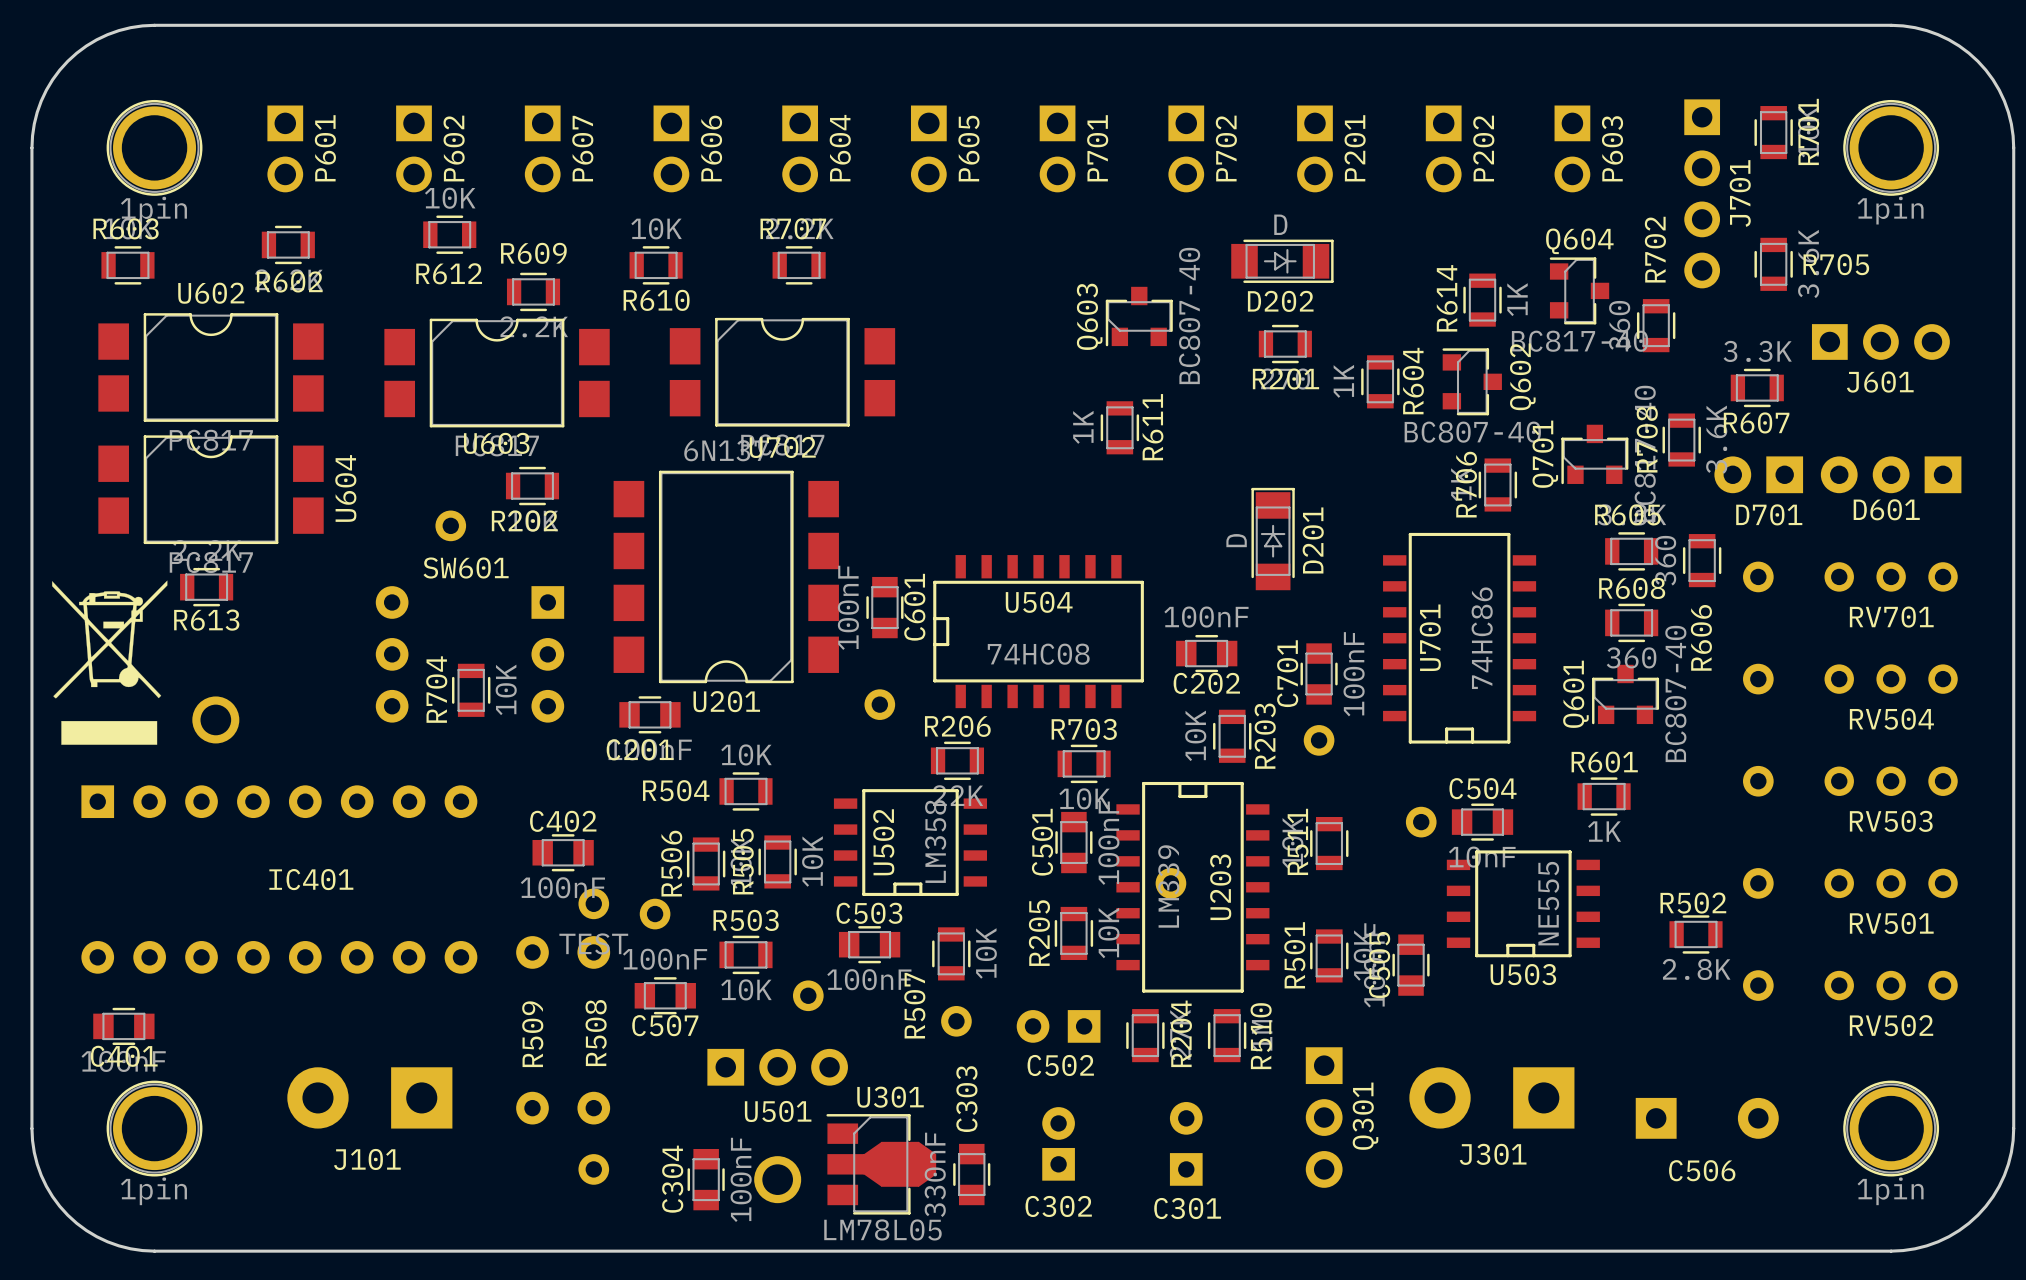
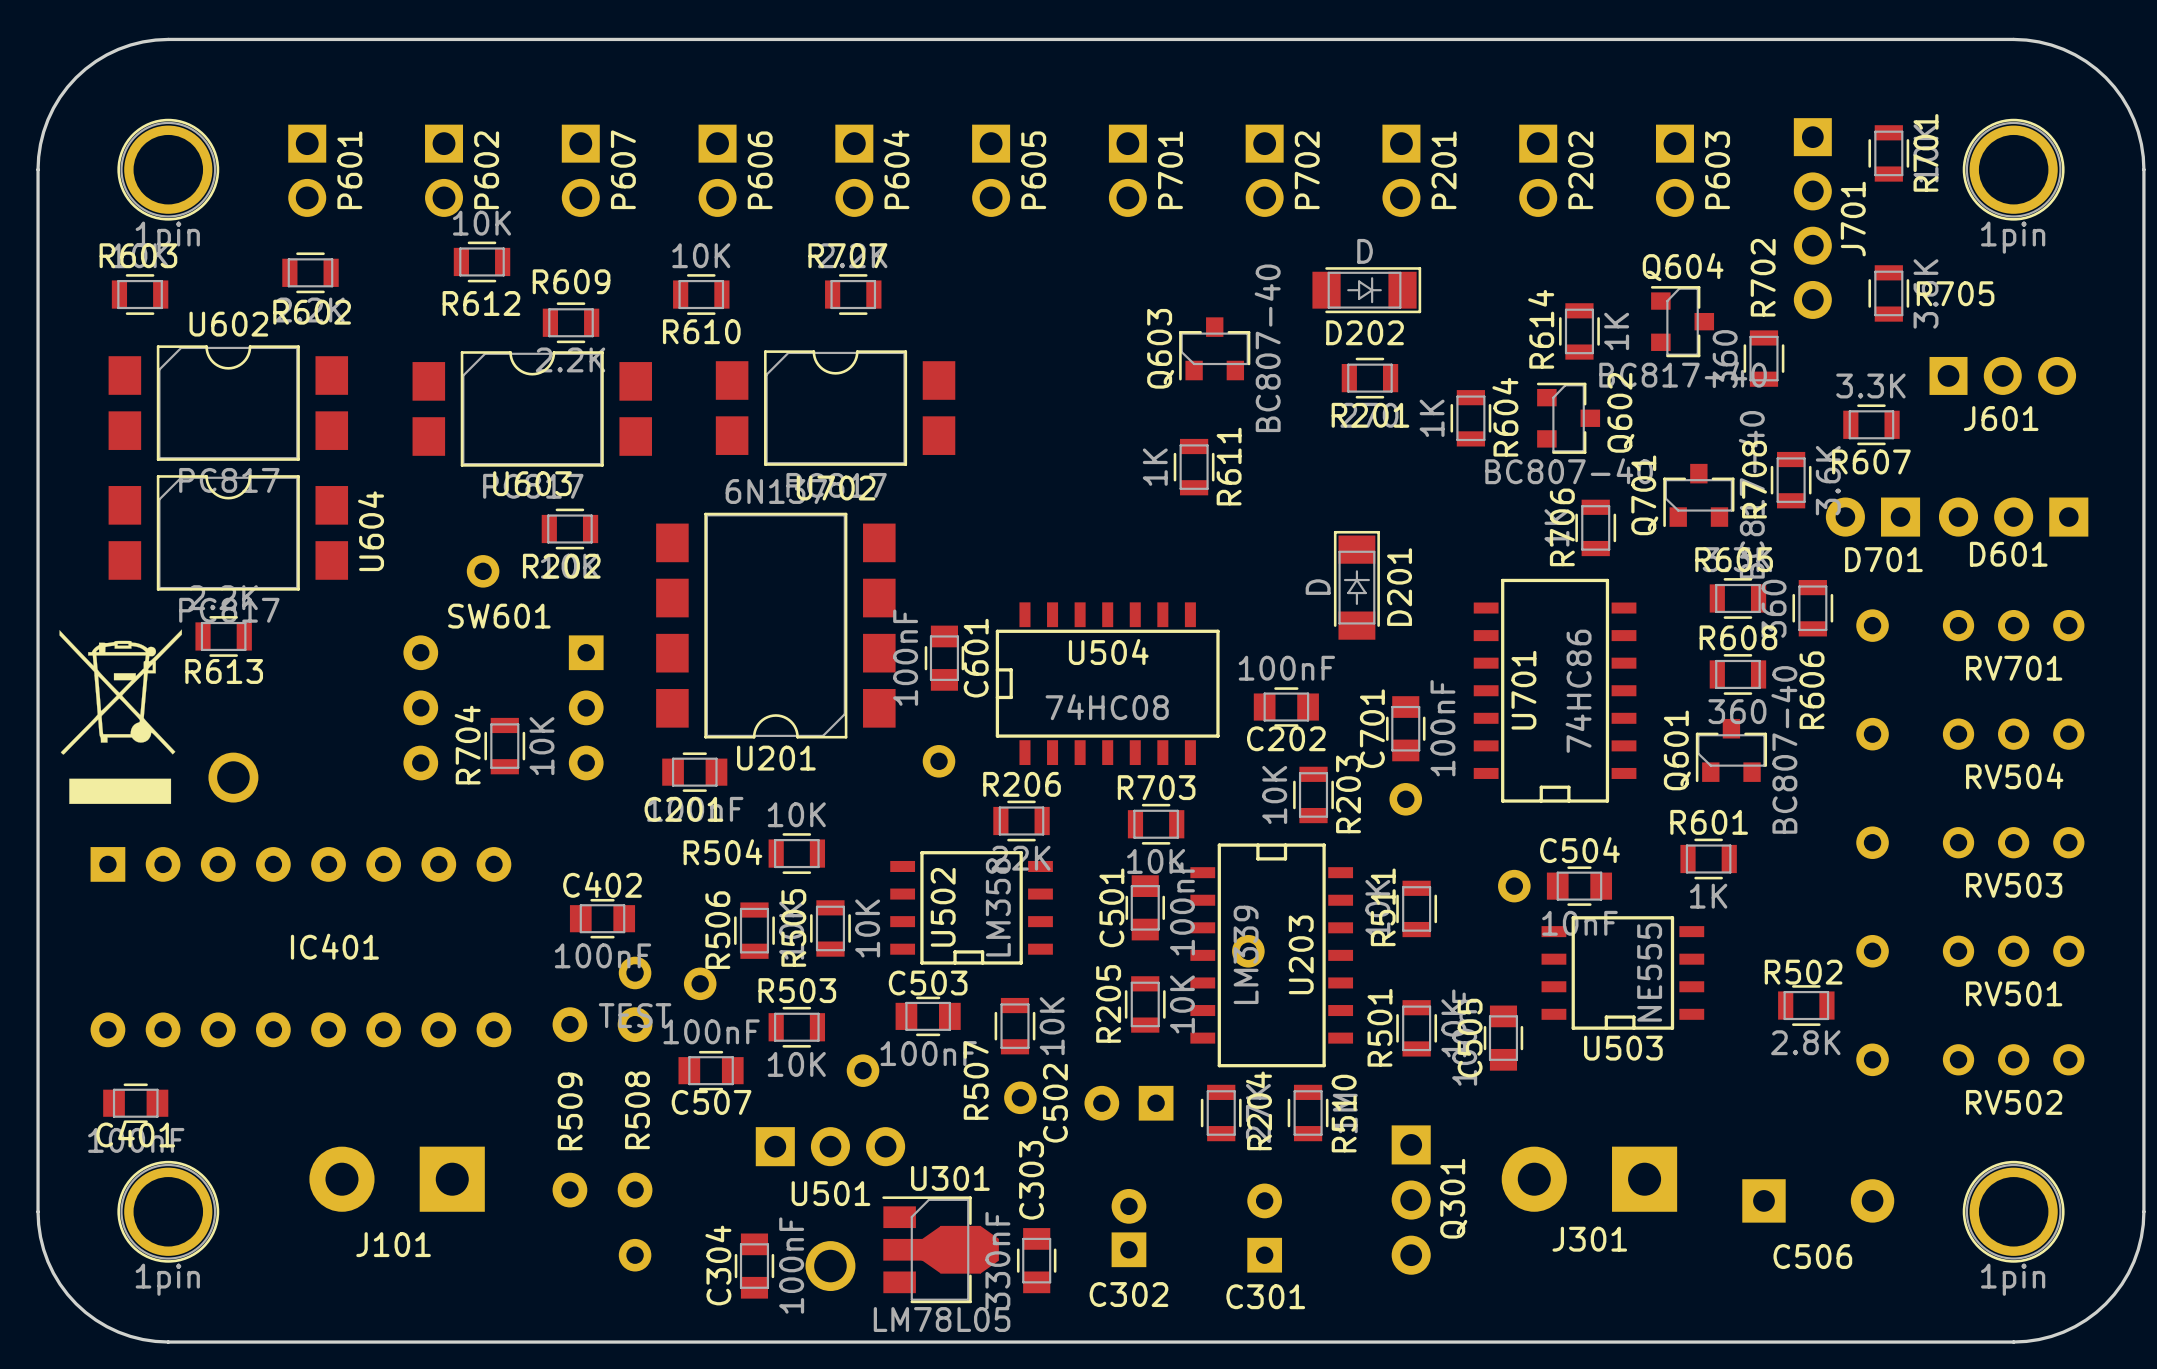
C502 name rotation: 0° (1060, 1065) -> 90° counterclockwise (1055, 1103)

